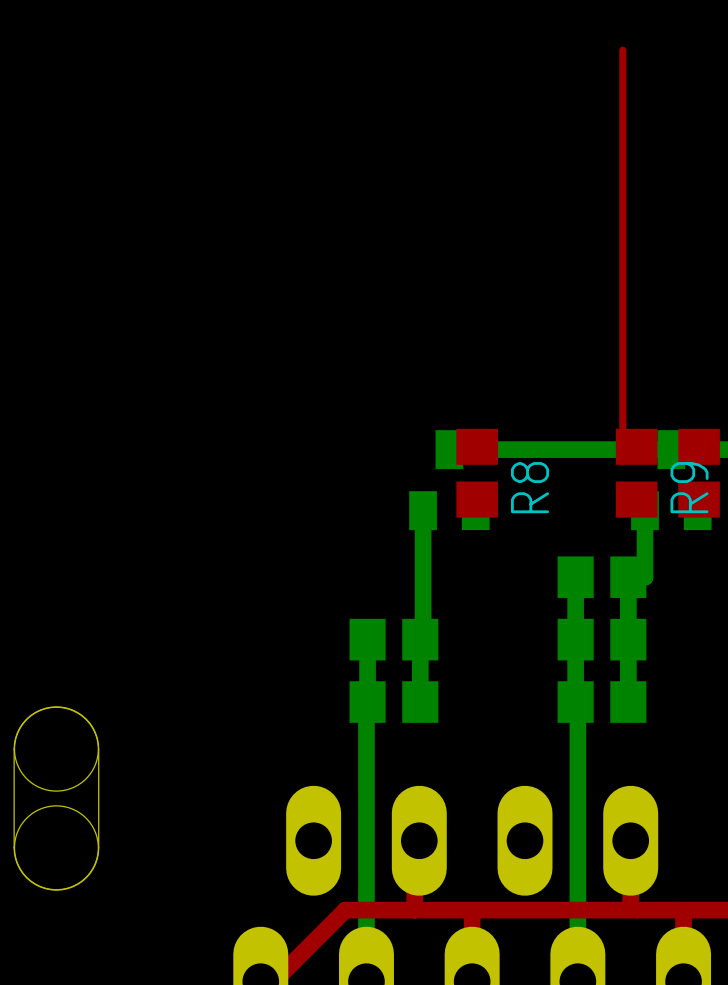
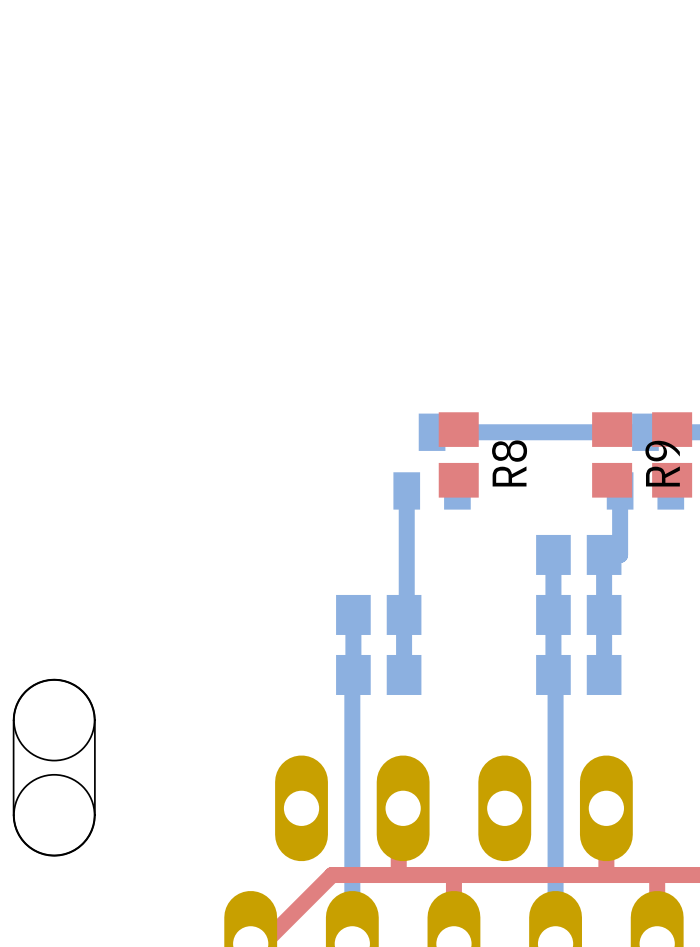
top track: (622, 50) (622, 446) (636, 446) -> none

